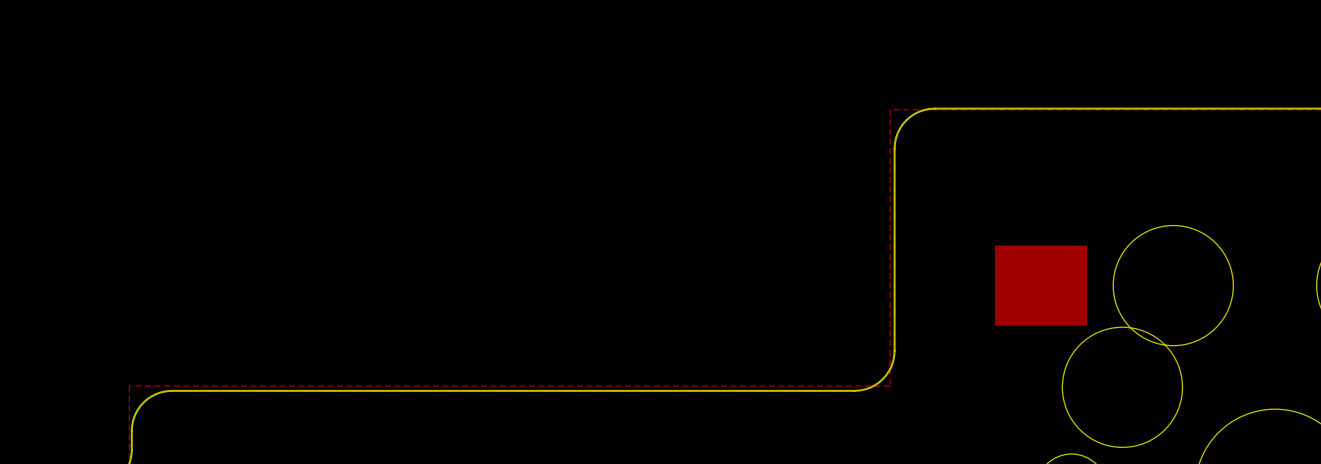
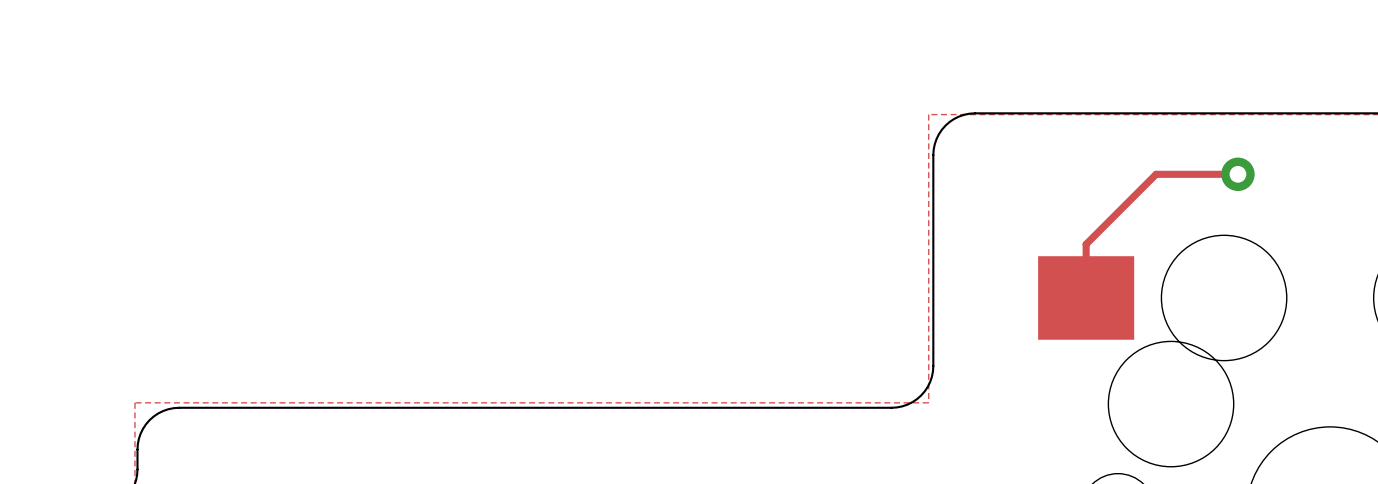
track: none -> (1237, 174) (1156, 174) (1086, 244) (1086, 297)
via: none -> (1237, 174)

